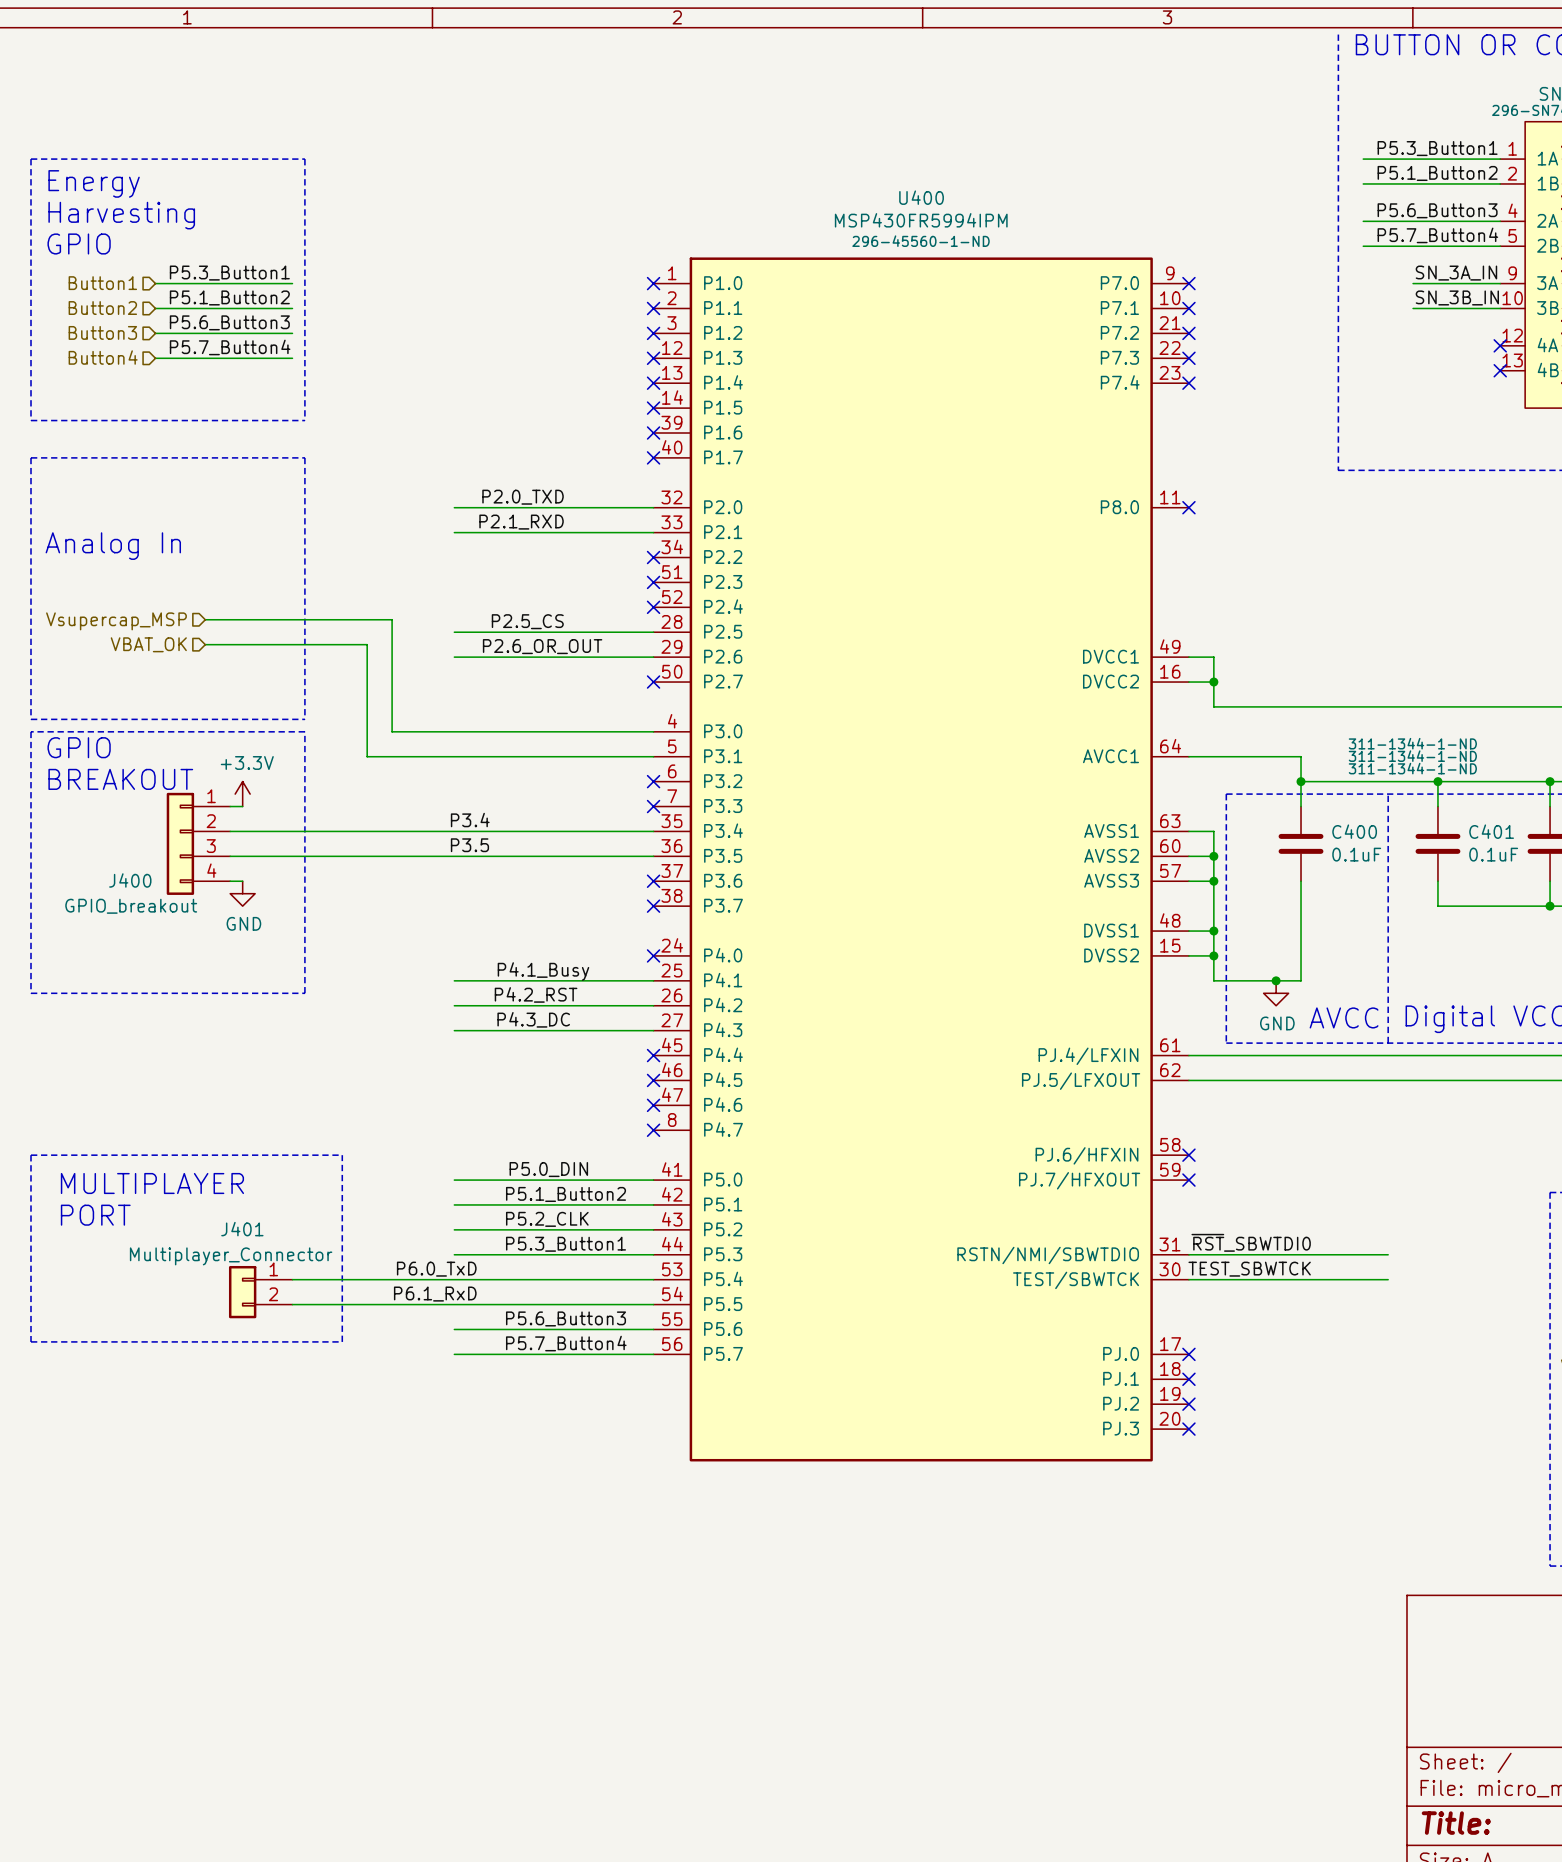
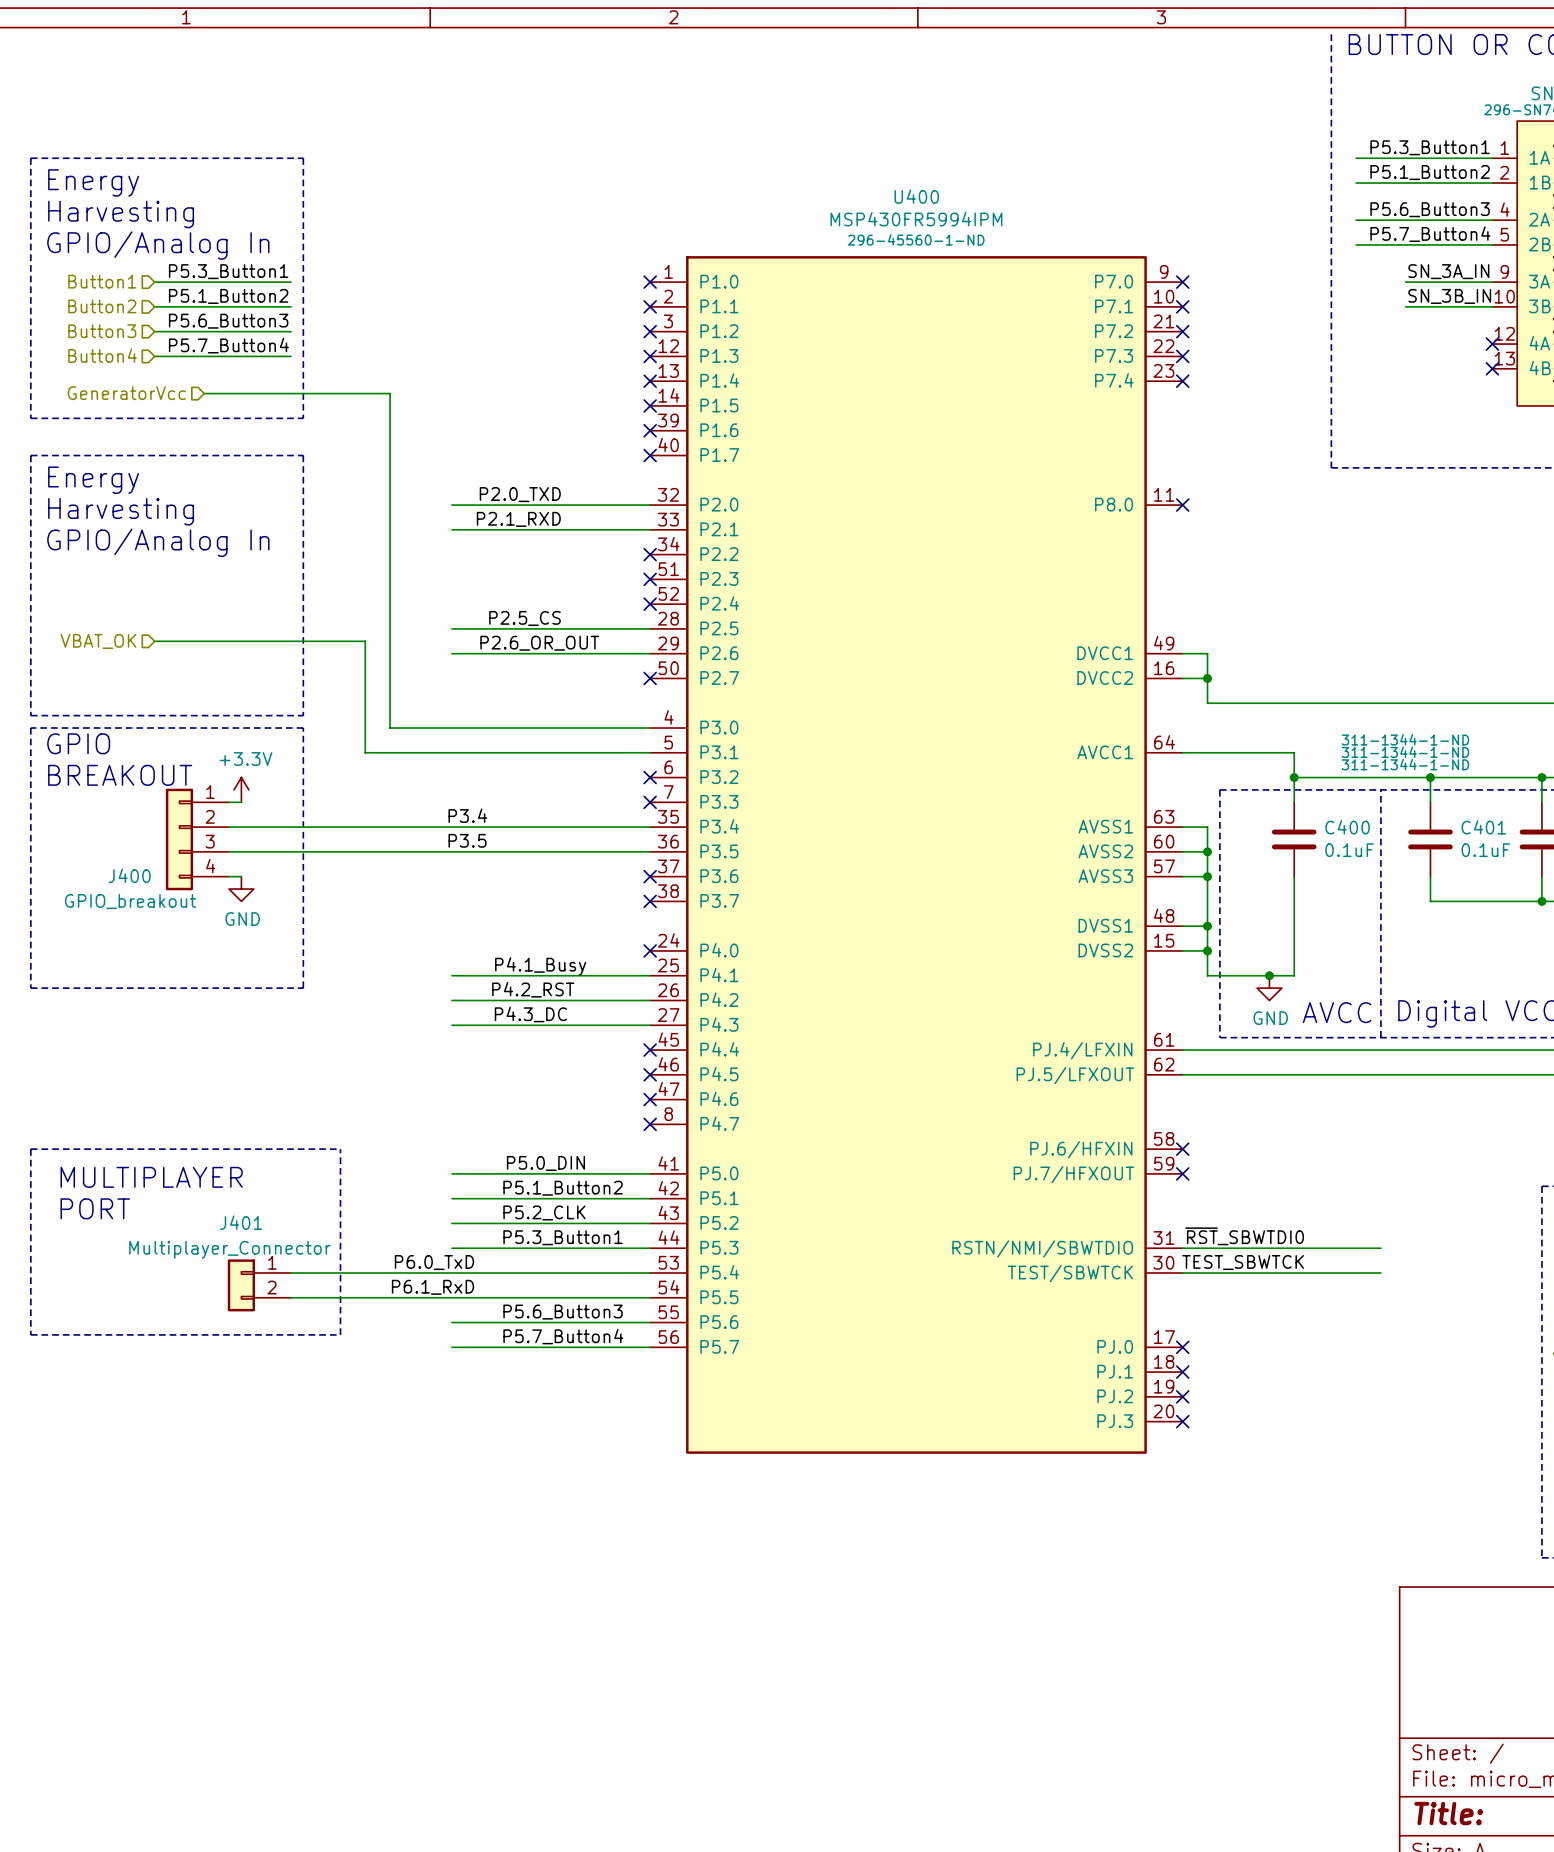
text: GPIO (79, 243) -> GPIO/Analog In (158, 245)
hierarchical label: none -> GeneratorVcc (126, 393)
text: none -> Energy (93, 480)
text: none -> Harvesting (121, 511)
text: Analog In (113, 546) -> GPIO/Analog In (158, 542)
wire: (205, 619) (392, 619) -> (204, 393) (390, 393) (390, 616)
hierarchical label: Vsupercap_MSP (116, 621) -> none
hierarchical label position: VBAT_OK (148, 644) -> VBAT_OK (98, 641)
wire: none -> (154, 641) (204, 641)

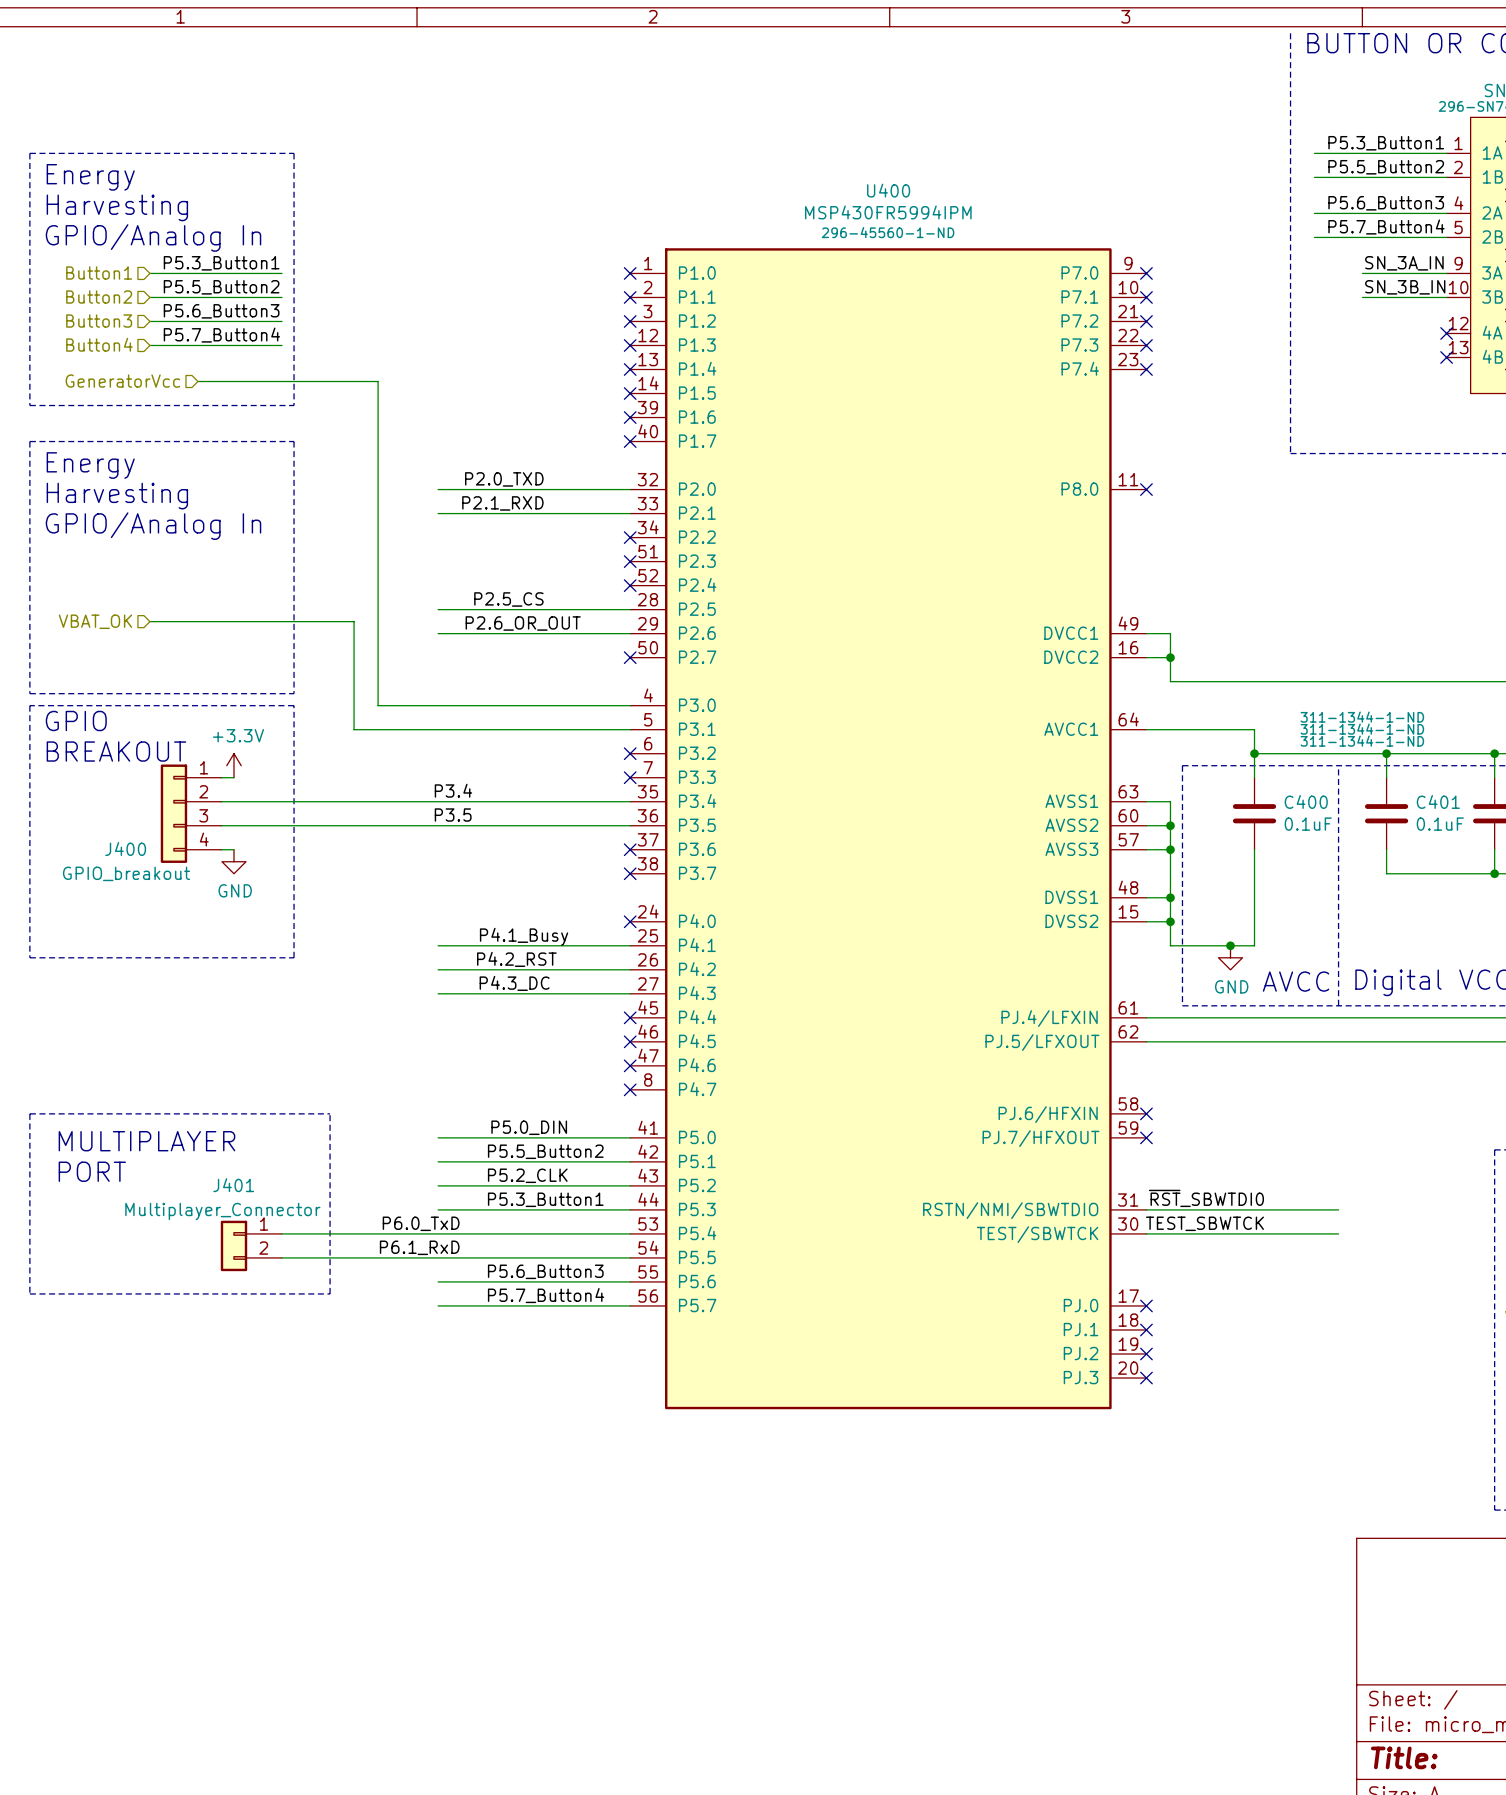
label: P5.1_Button2 (1430, 172) -> P5.5_Button2 (1386, 167)
label: P5.1_Button2 (228, 296) -> P5.5_Button2 (221, 287)
label: P5.1_Button2 (563, 1188) -> P5.5_Button2 (545, 1151)

